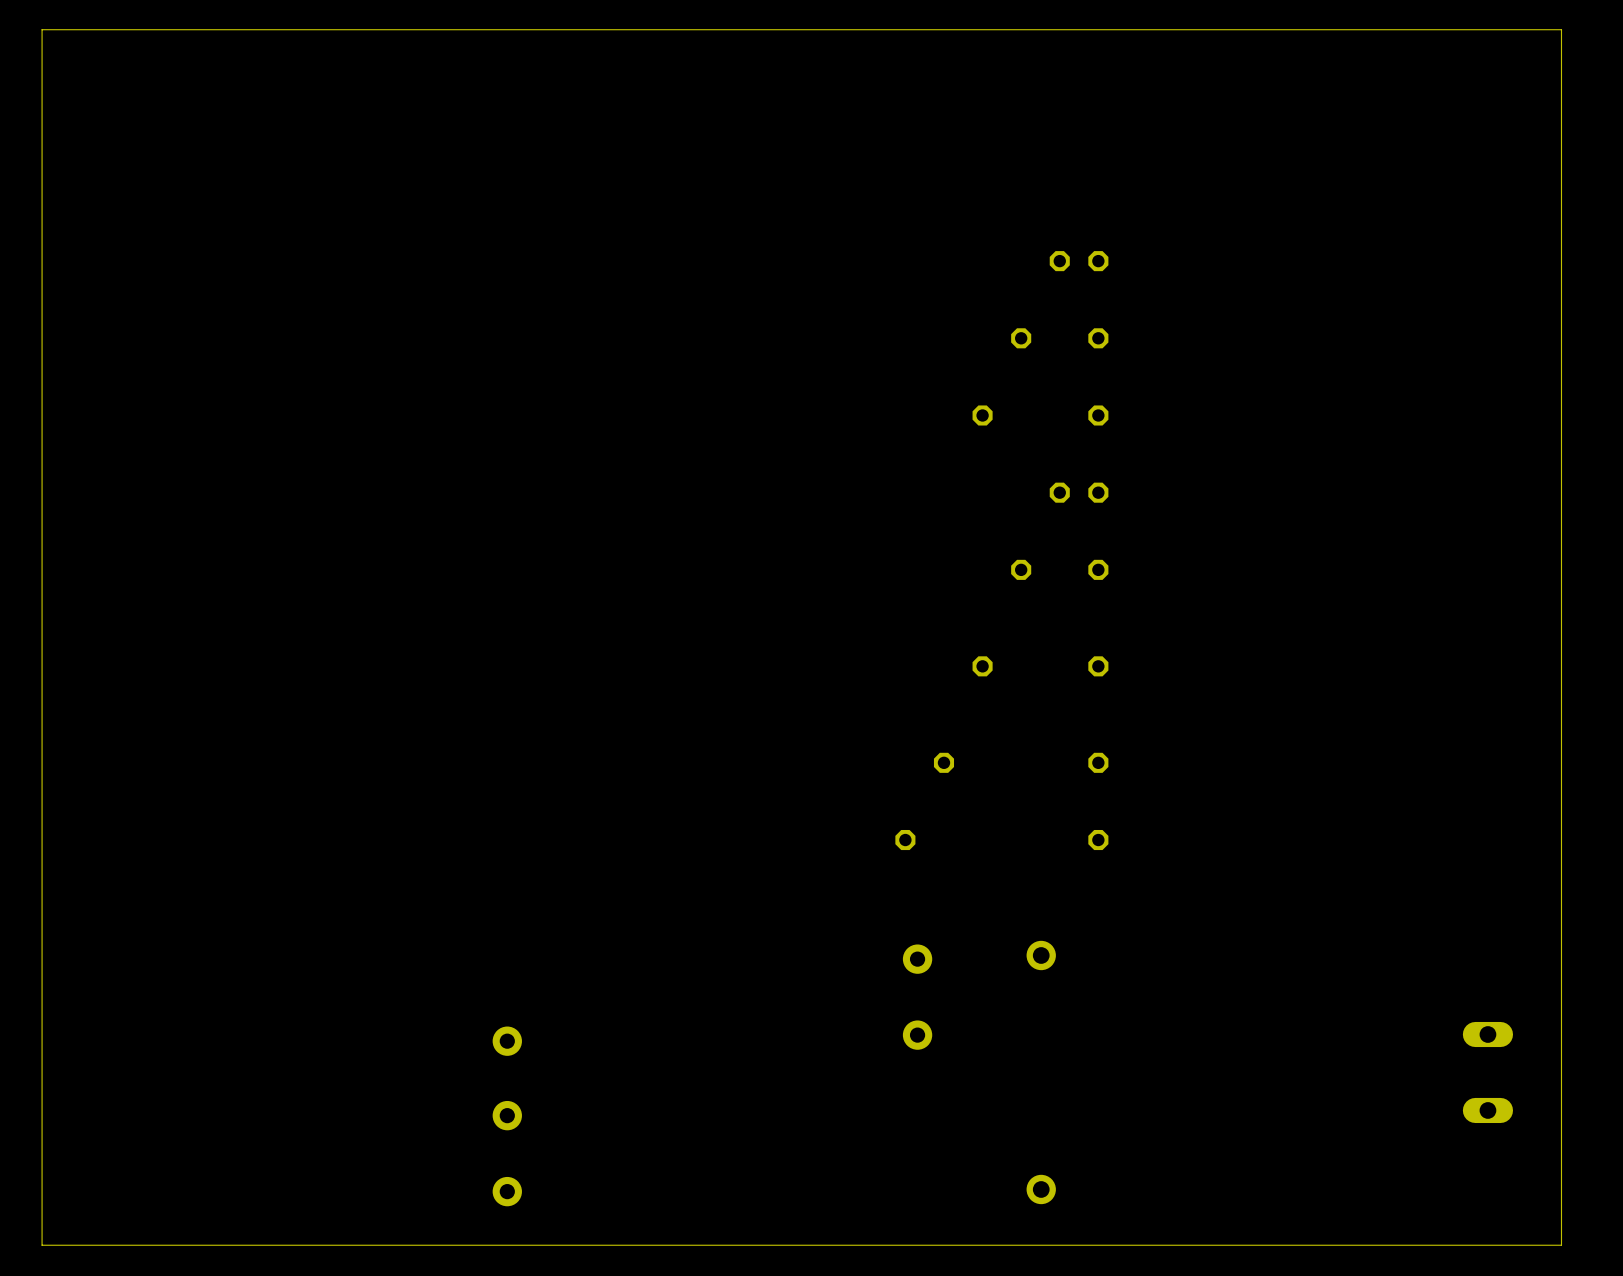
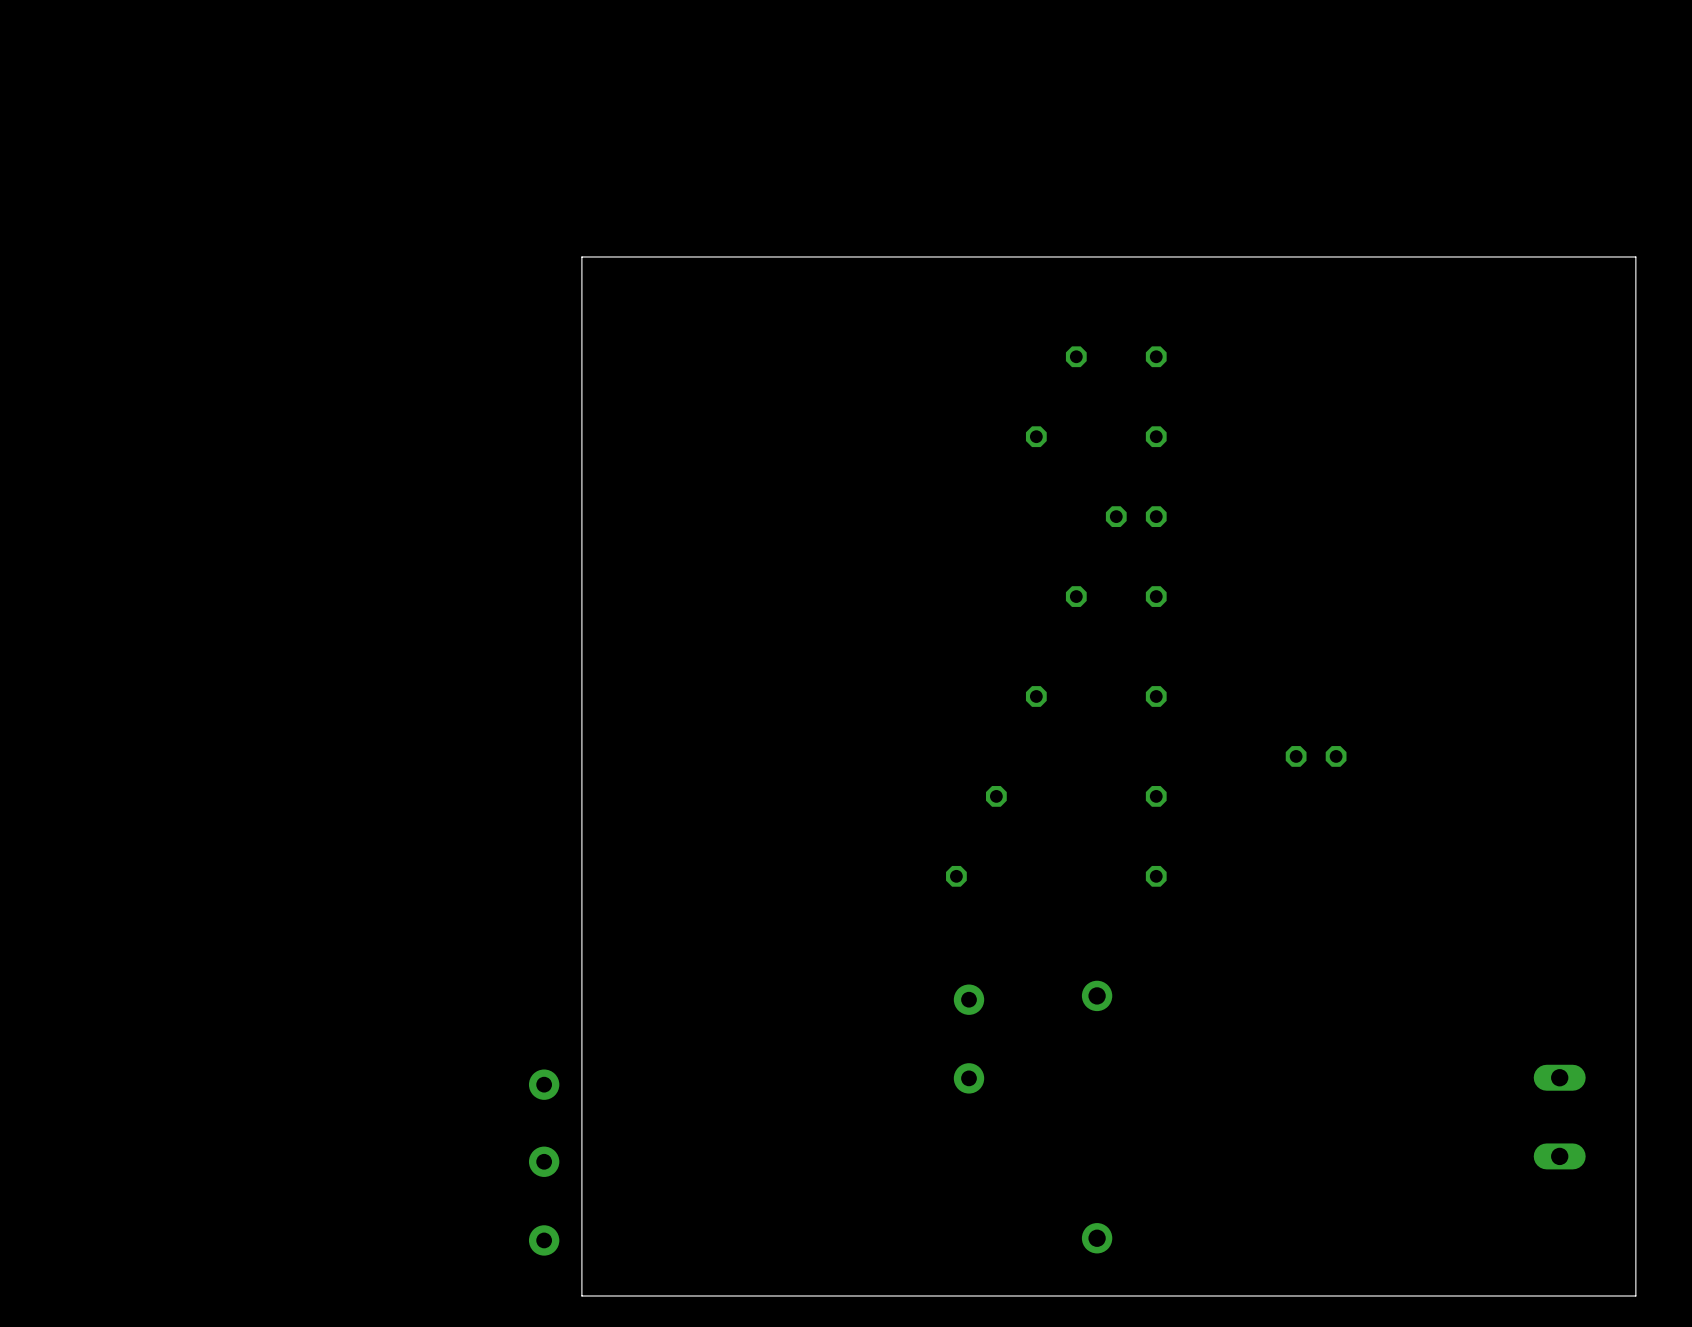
board edge: (1561, 241) (1561, 29) (42, 29) (42, 1245) (543, 1245) -> (1635, 256) (581, 256) (581, 1295)
part: (1079, 261) -> none
part: none -> (1316, 756)

